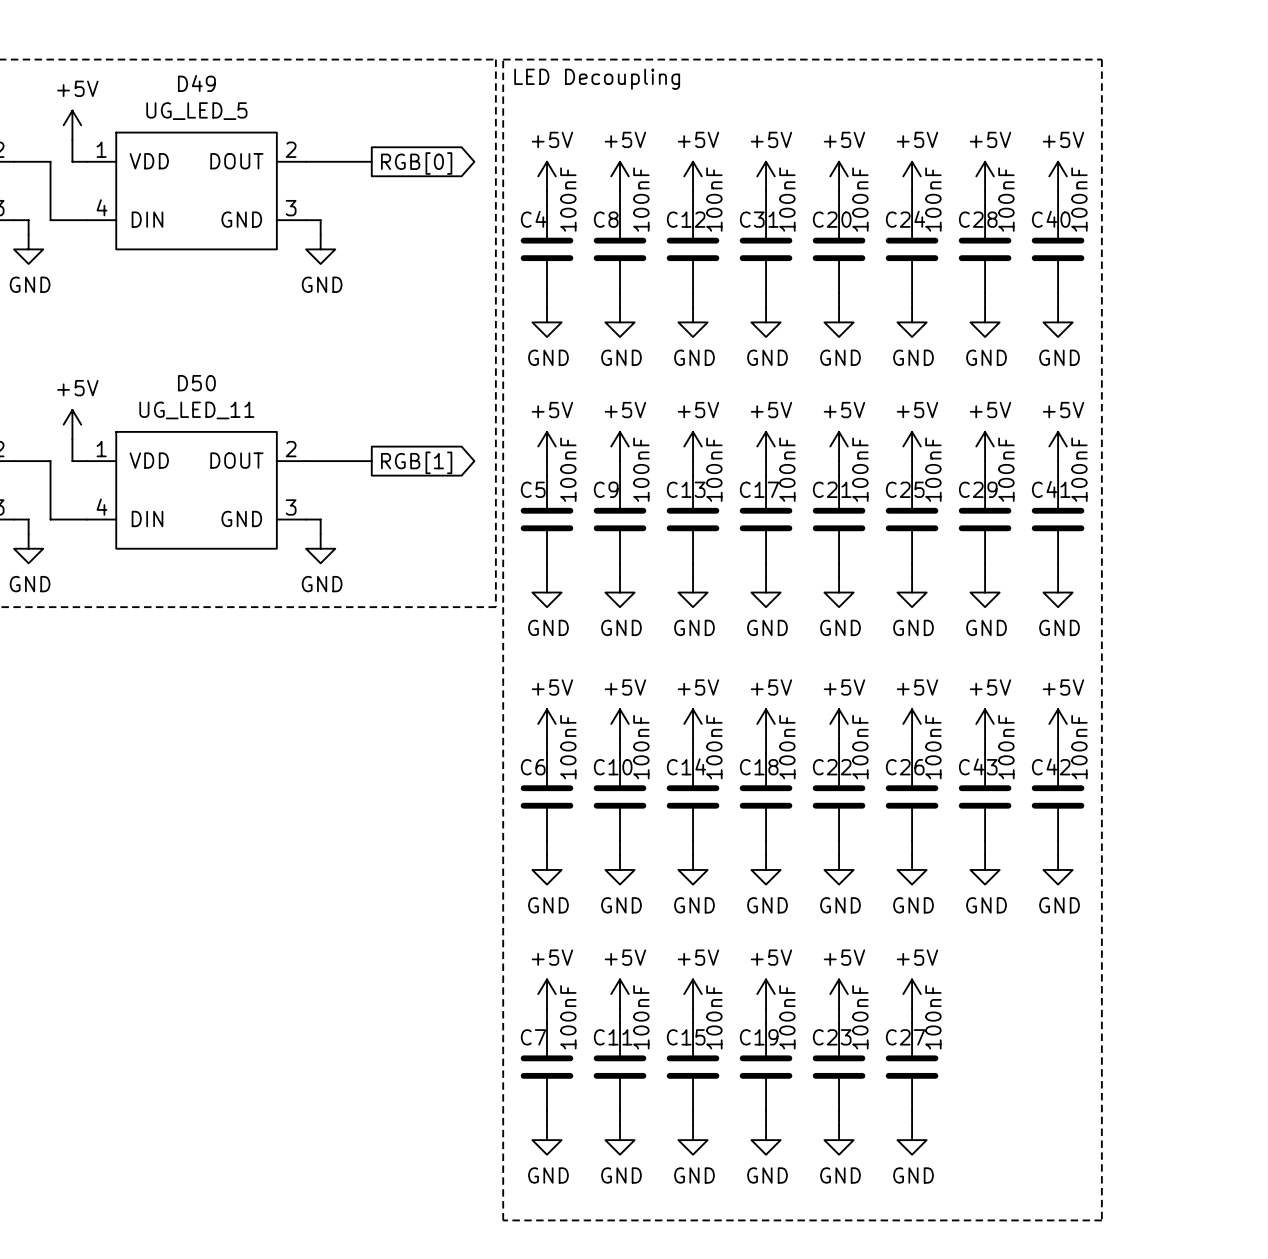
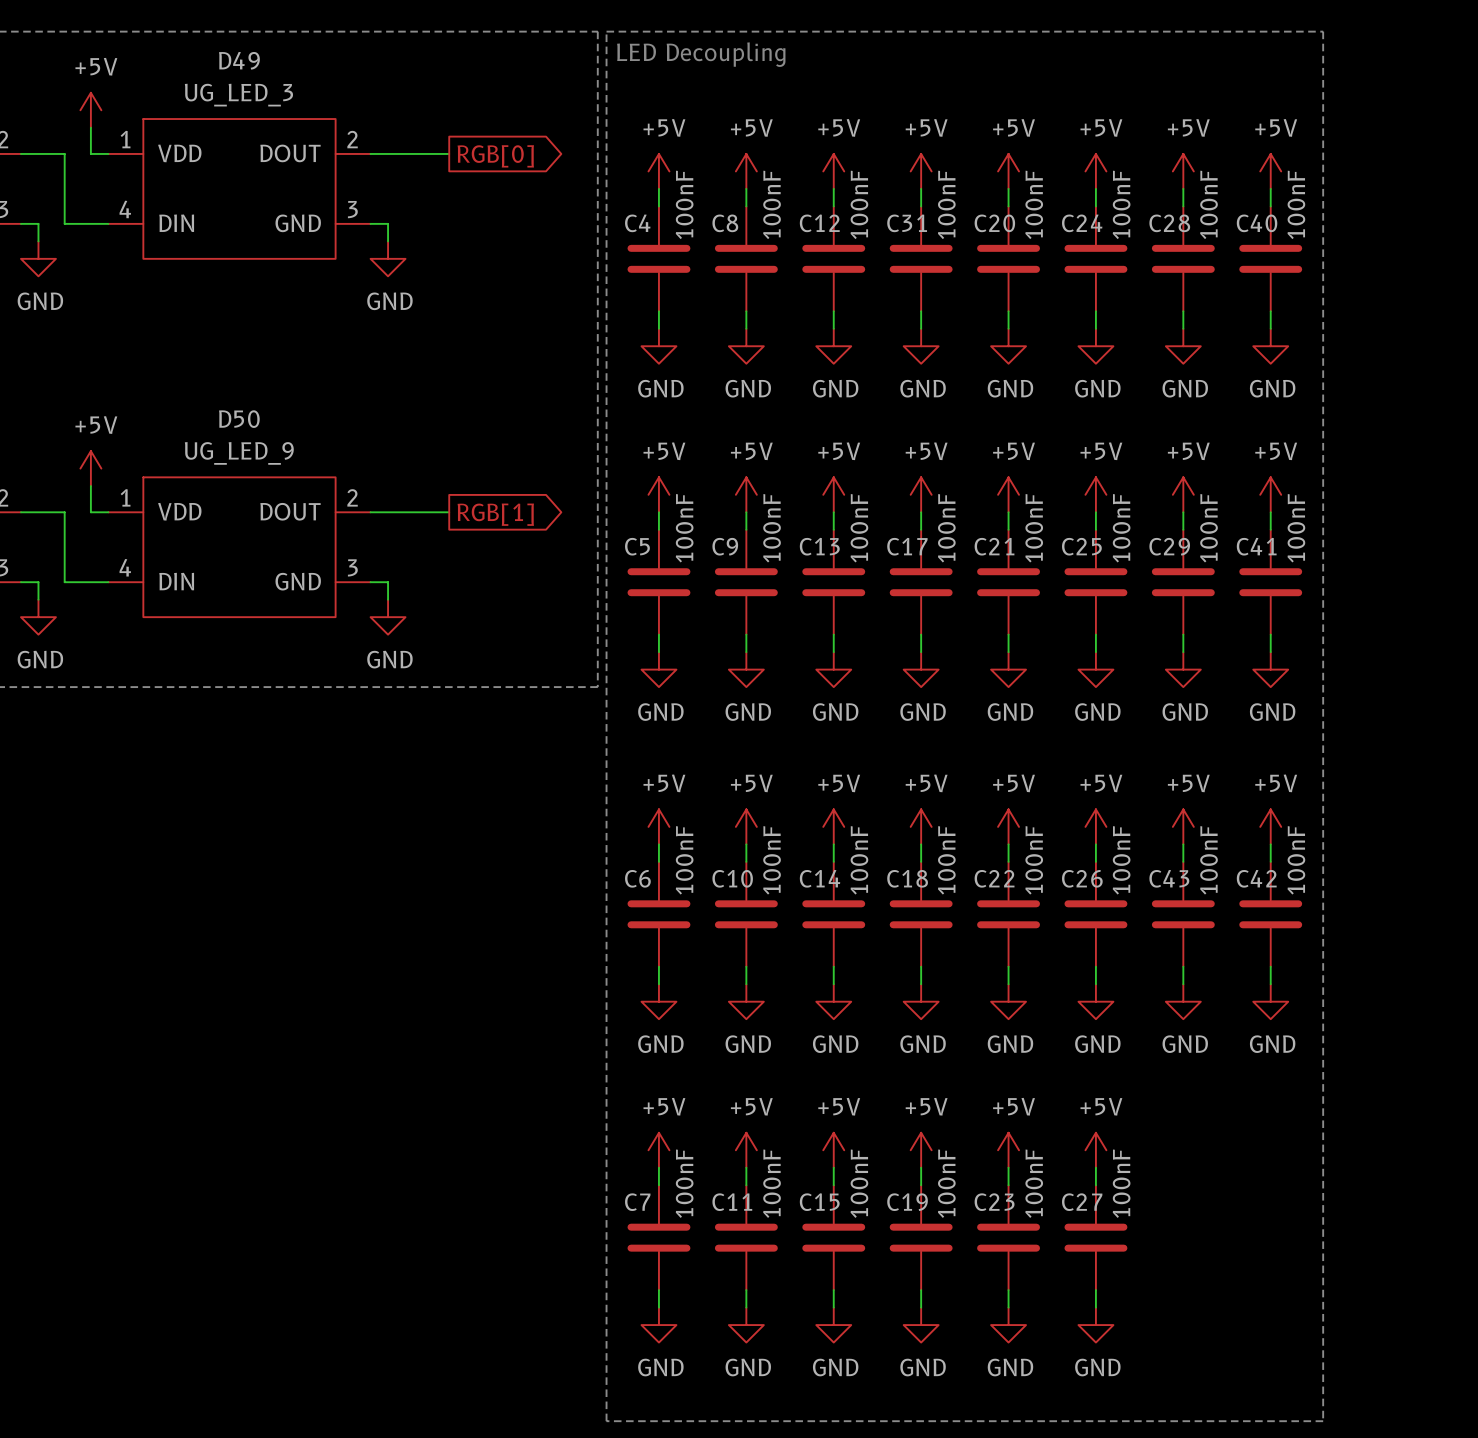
D49 value: UG_LED_5 (196, 111) -> UG_LED_3 (238, 95)
D50 value: UG_LED_11 (196, 410) -> UG_LED_9 (239, 453)

